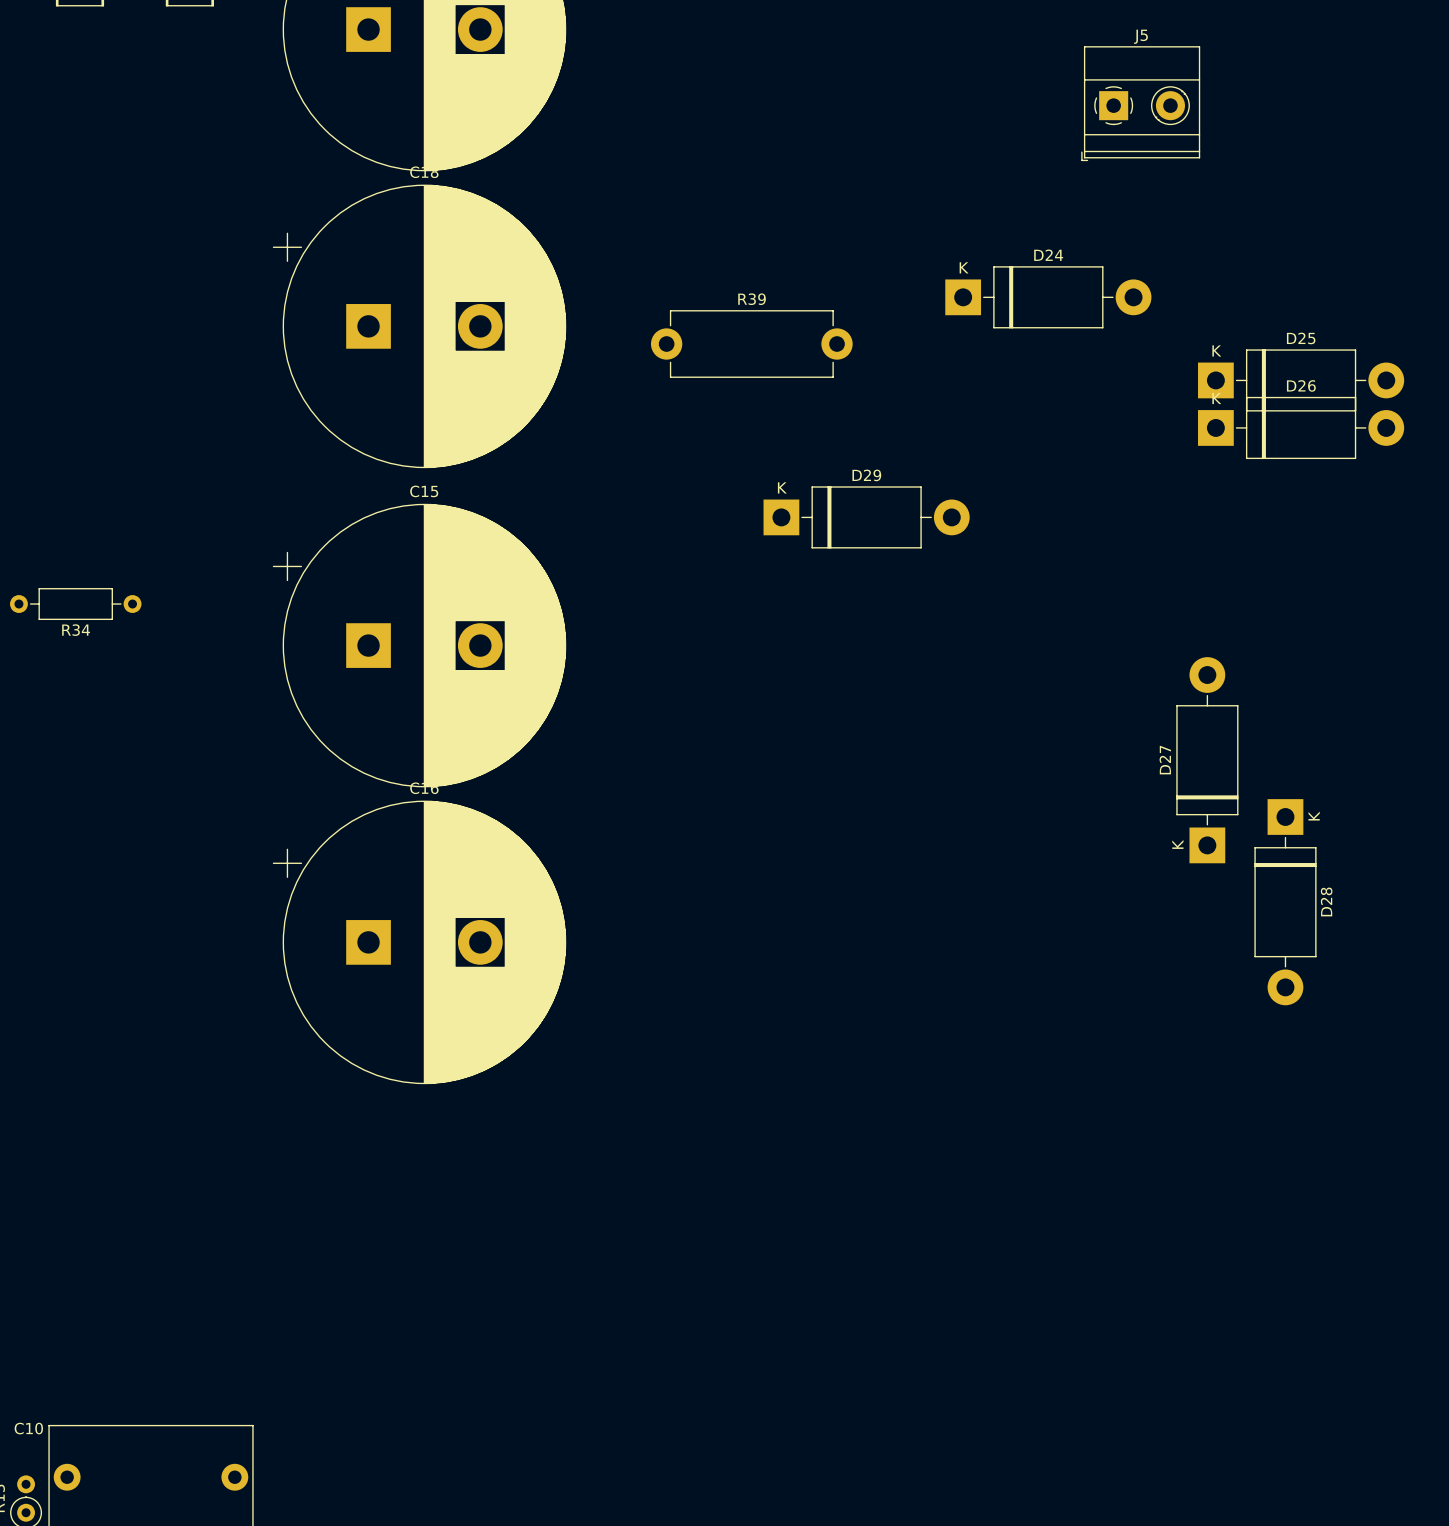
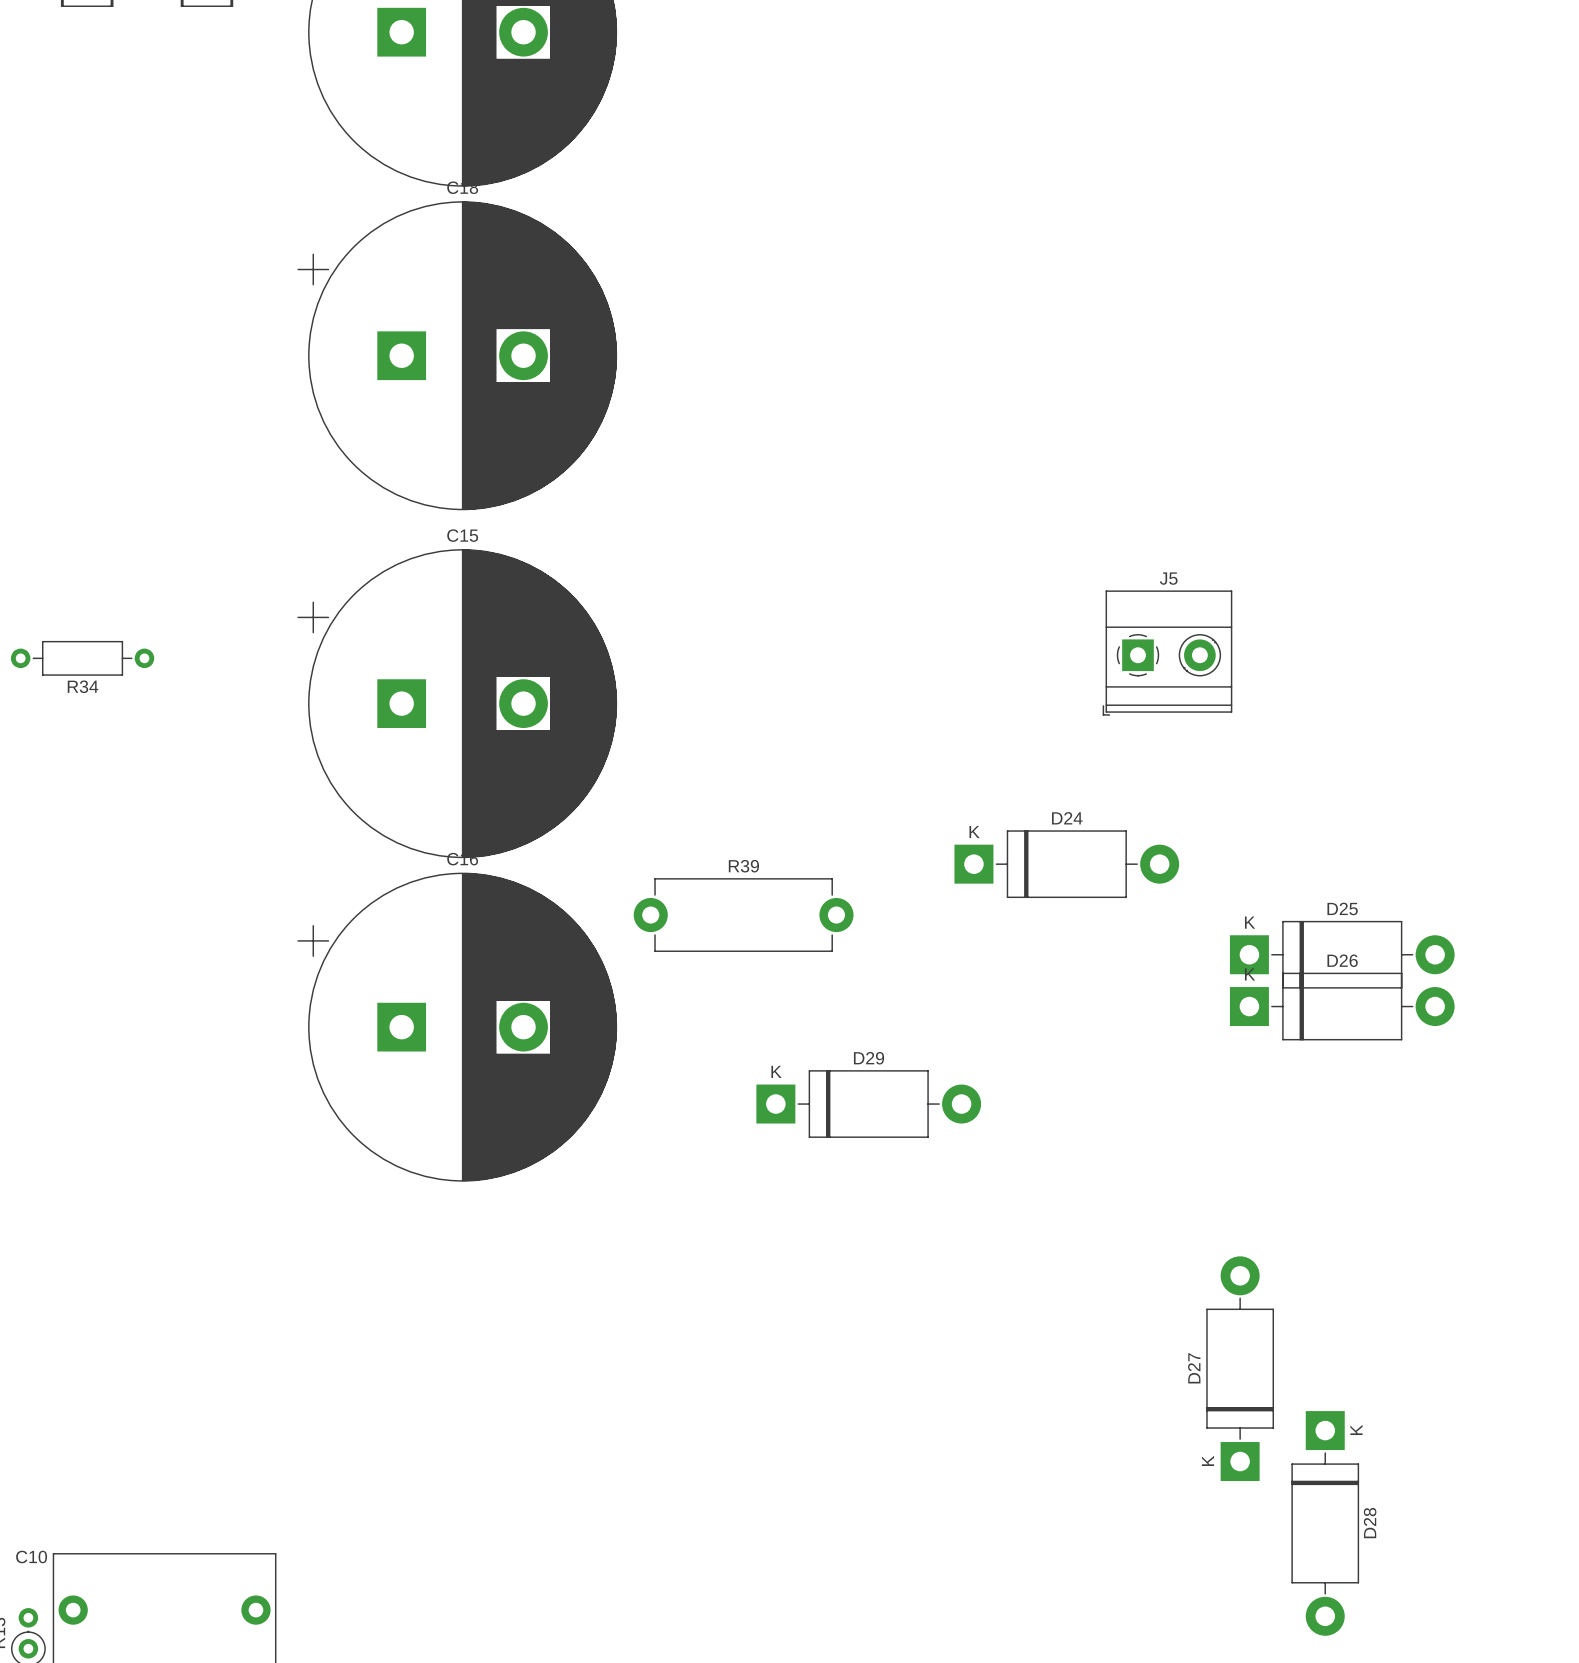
J5 position: (1140, 103) -> (1167, 653)
D24 position: (1048, 297) -> (1066, 864)
R39 position: (751, 344) -> (743, 915)
D25 position: (1301, 380) -> (1342, 954)
D26 position: (1301, 427) -> (1342, 1006)
D29 position: (866, 517) -> (868, 1104)
D27 position: (1207, 760) -> (1240, 1368)
D28 position: (1285, 902) -> (1325, 1523)

